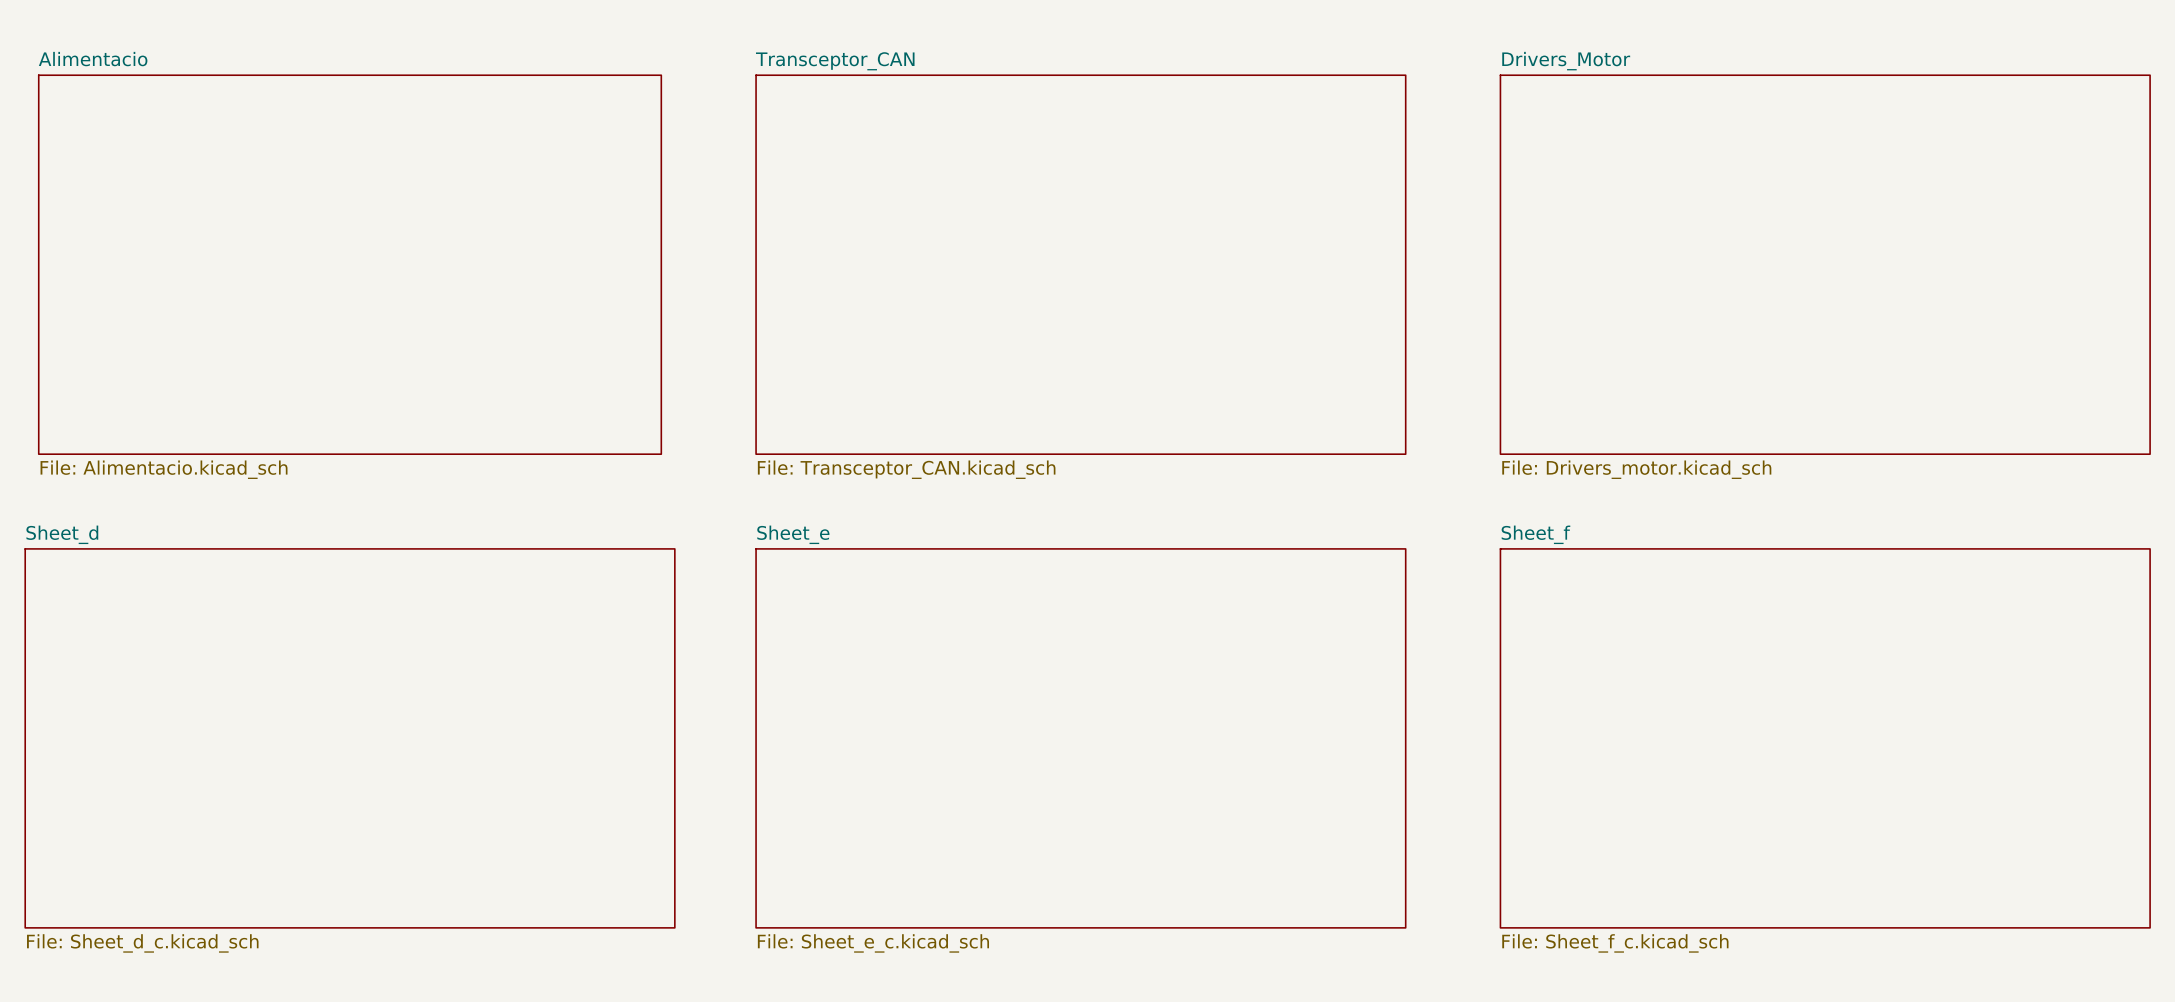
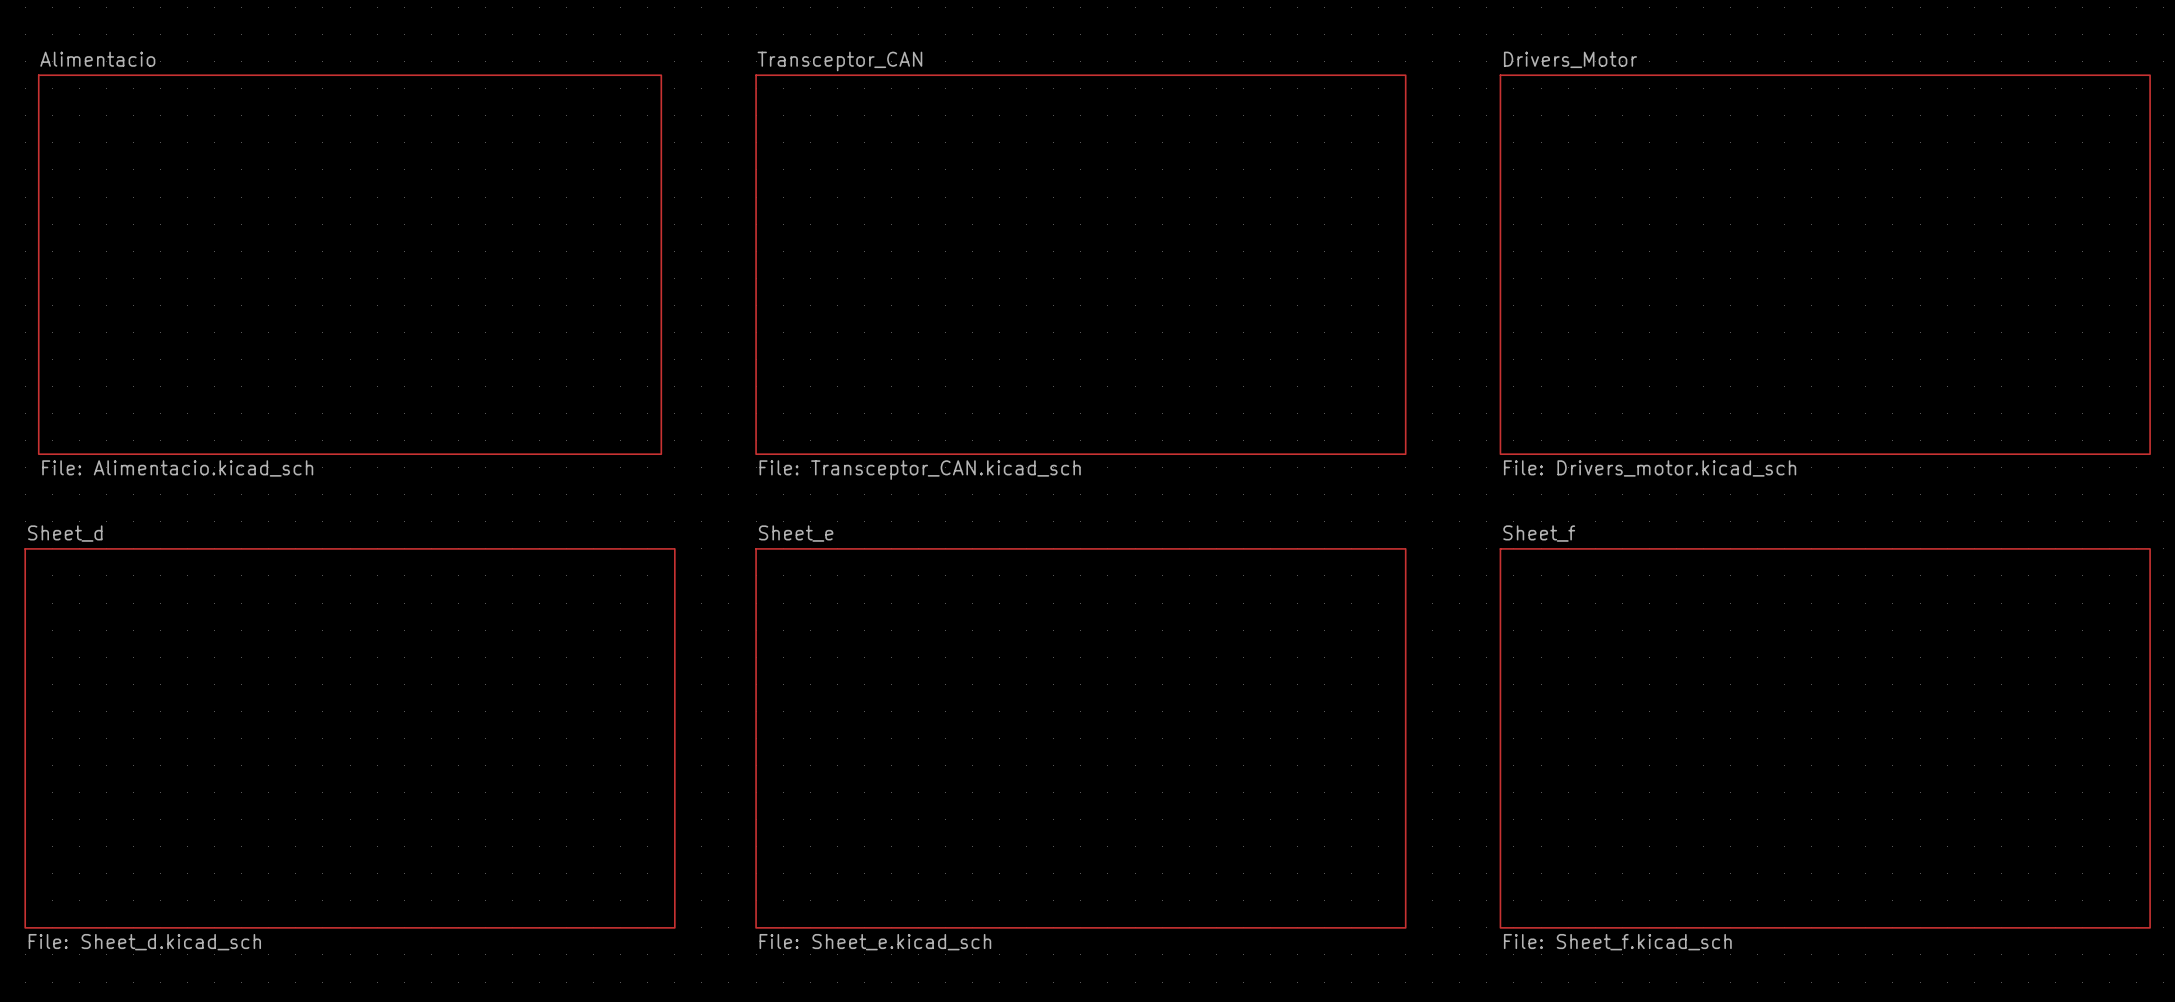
sheet Sheet_d value: File: Sheet_d_c.kicad_sch (142, 943) -> File: Sheet_d.kicad_sch (144, 942)
sheet Sheet_e value: File: Sheet_e_c.kicad_sch (873, 943) -> File: Sheet_e.kicad_sch (875, 942)
sheet Sheet_f value: File: Sheet_f_c.kicad_sch (1615, 943) -> File: Sheet_f.kicad_sch (1617, 942)

